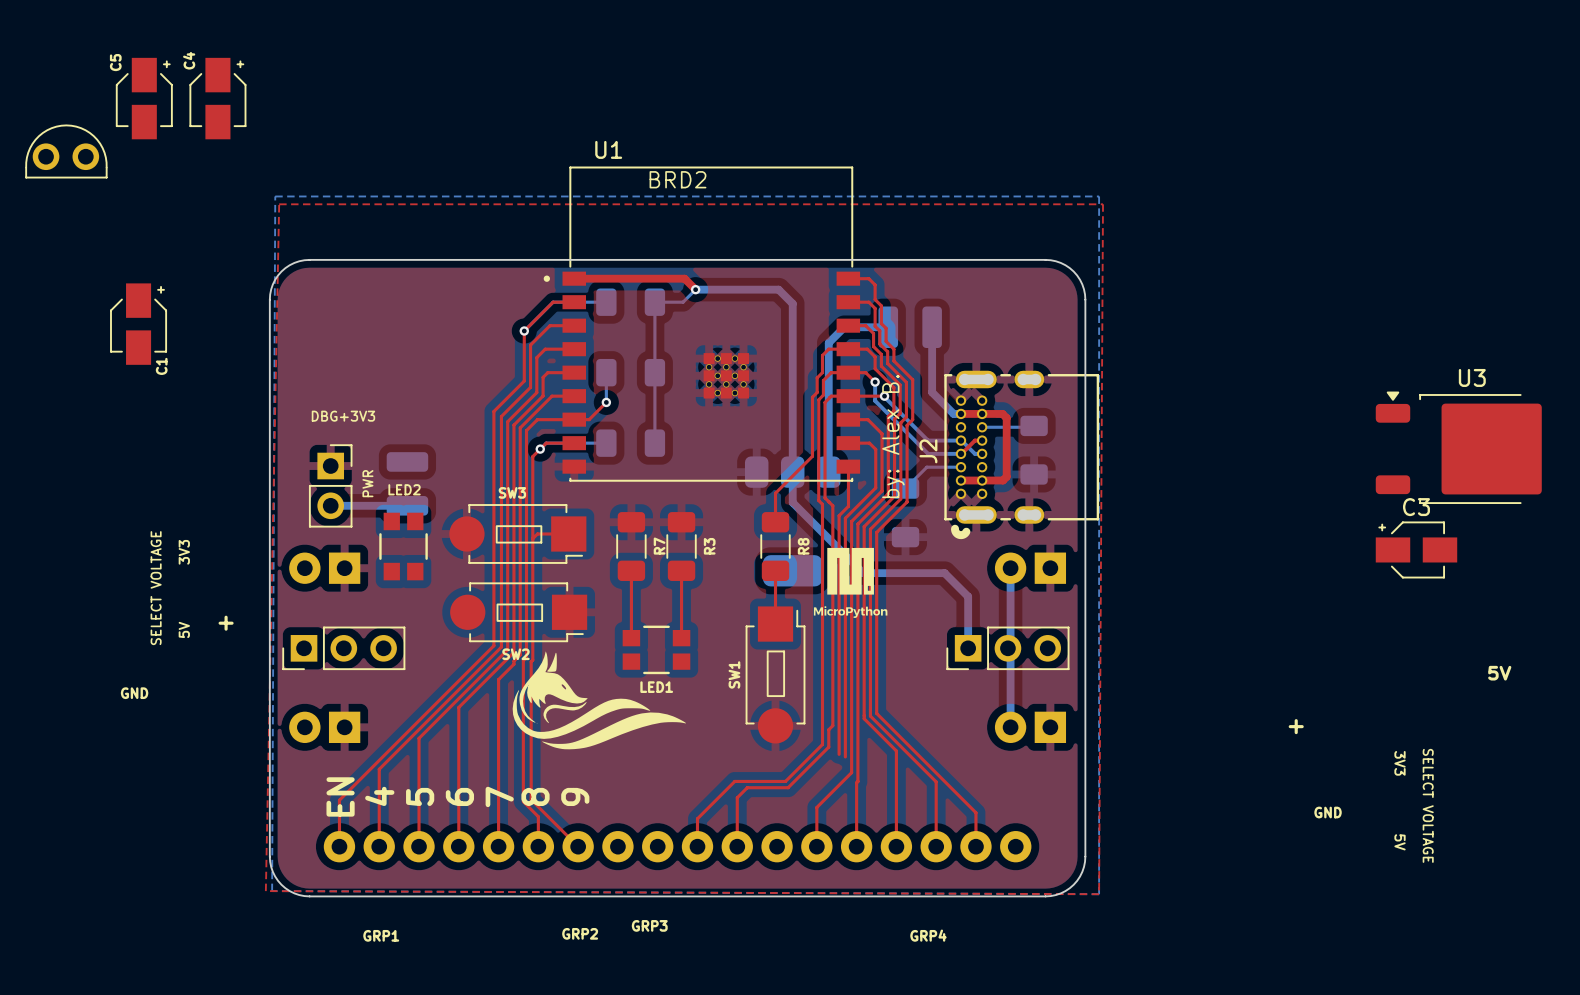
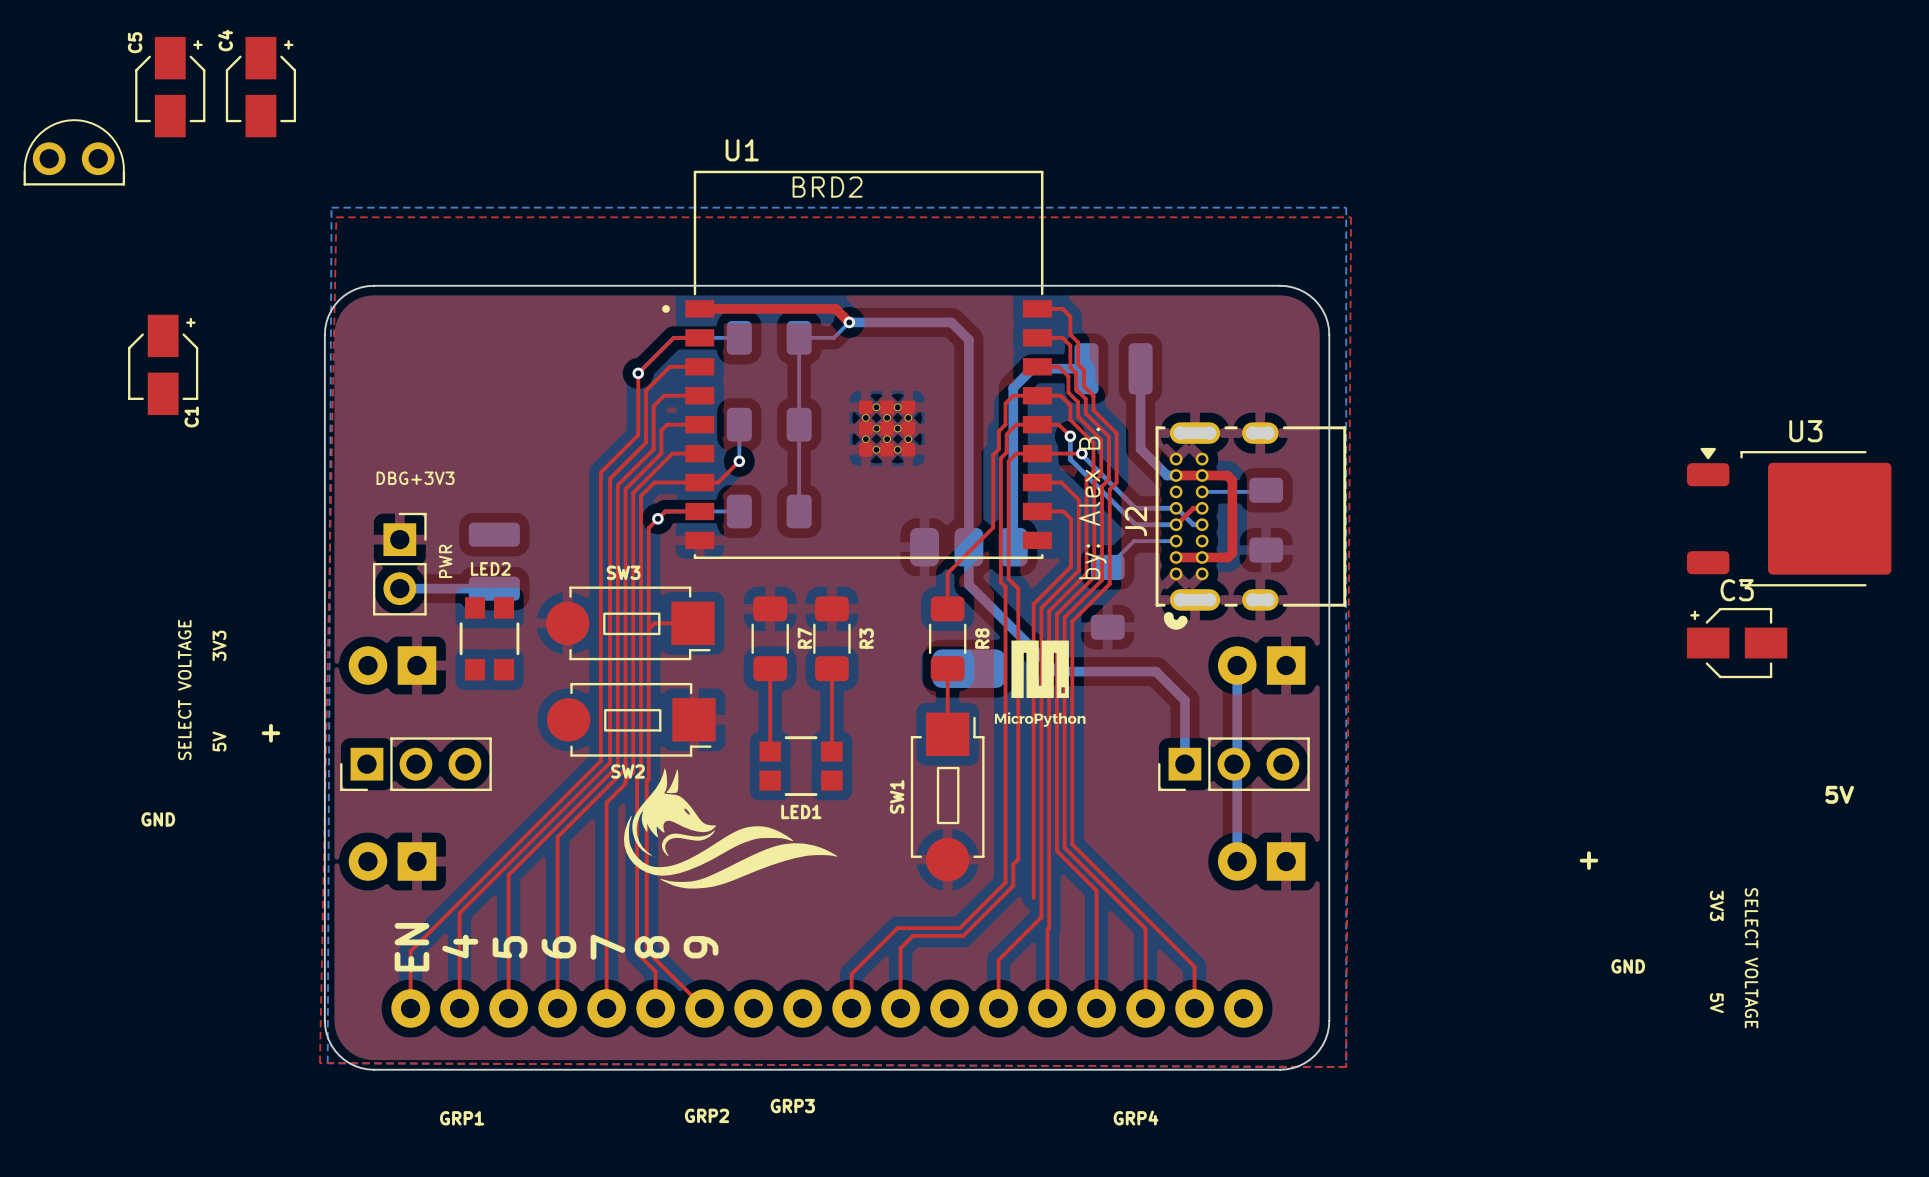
top track: (848, 466) (848, 506) (839, 515) (839, 754) -> none

